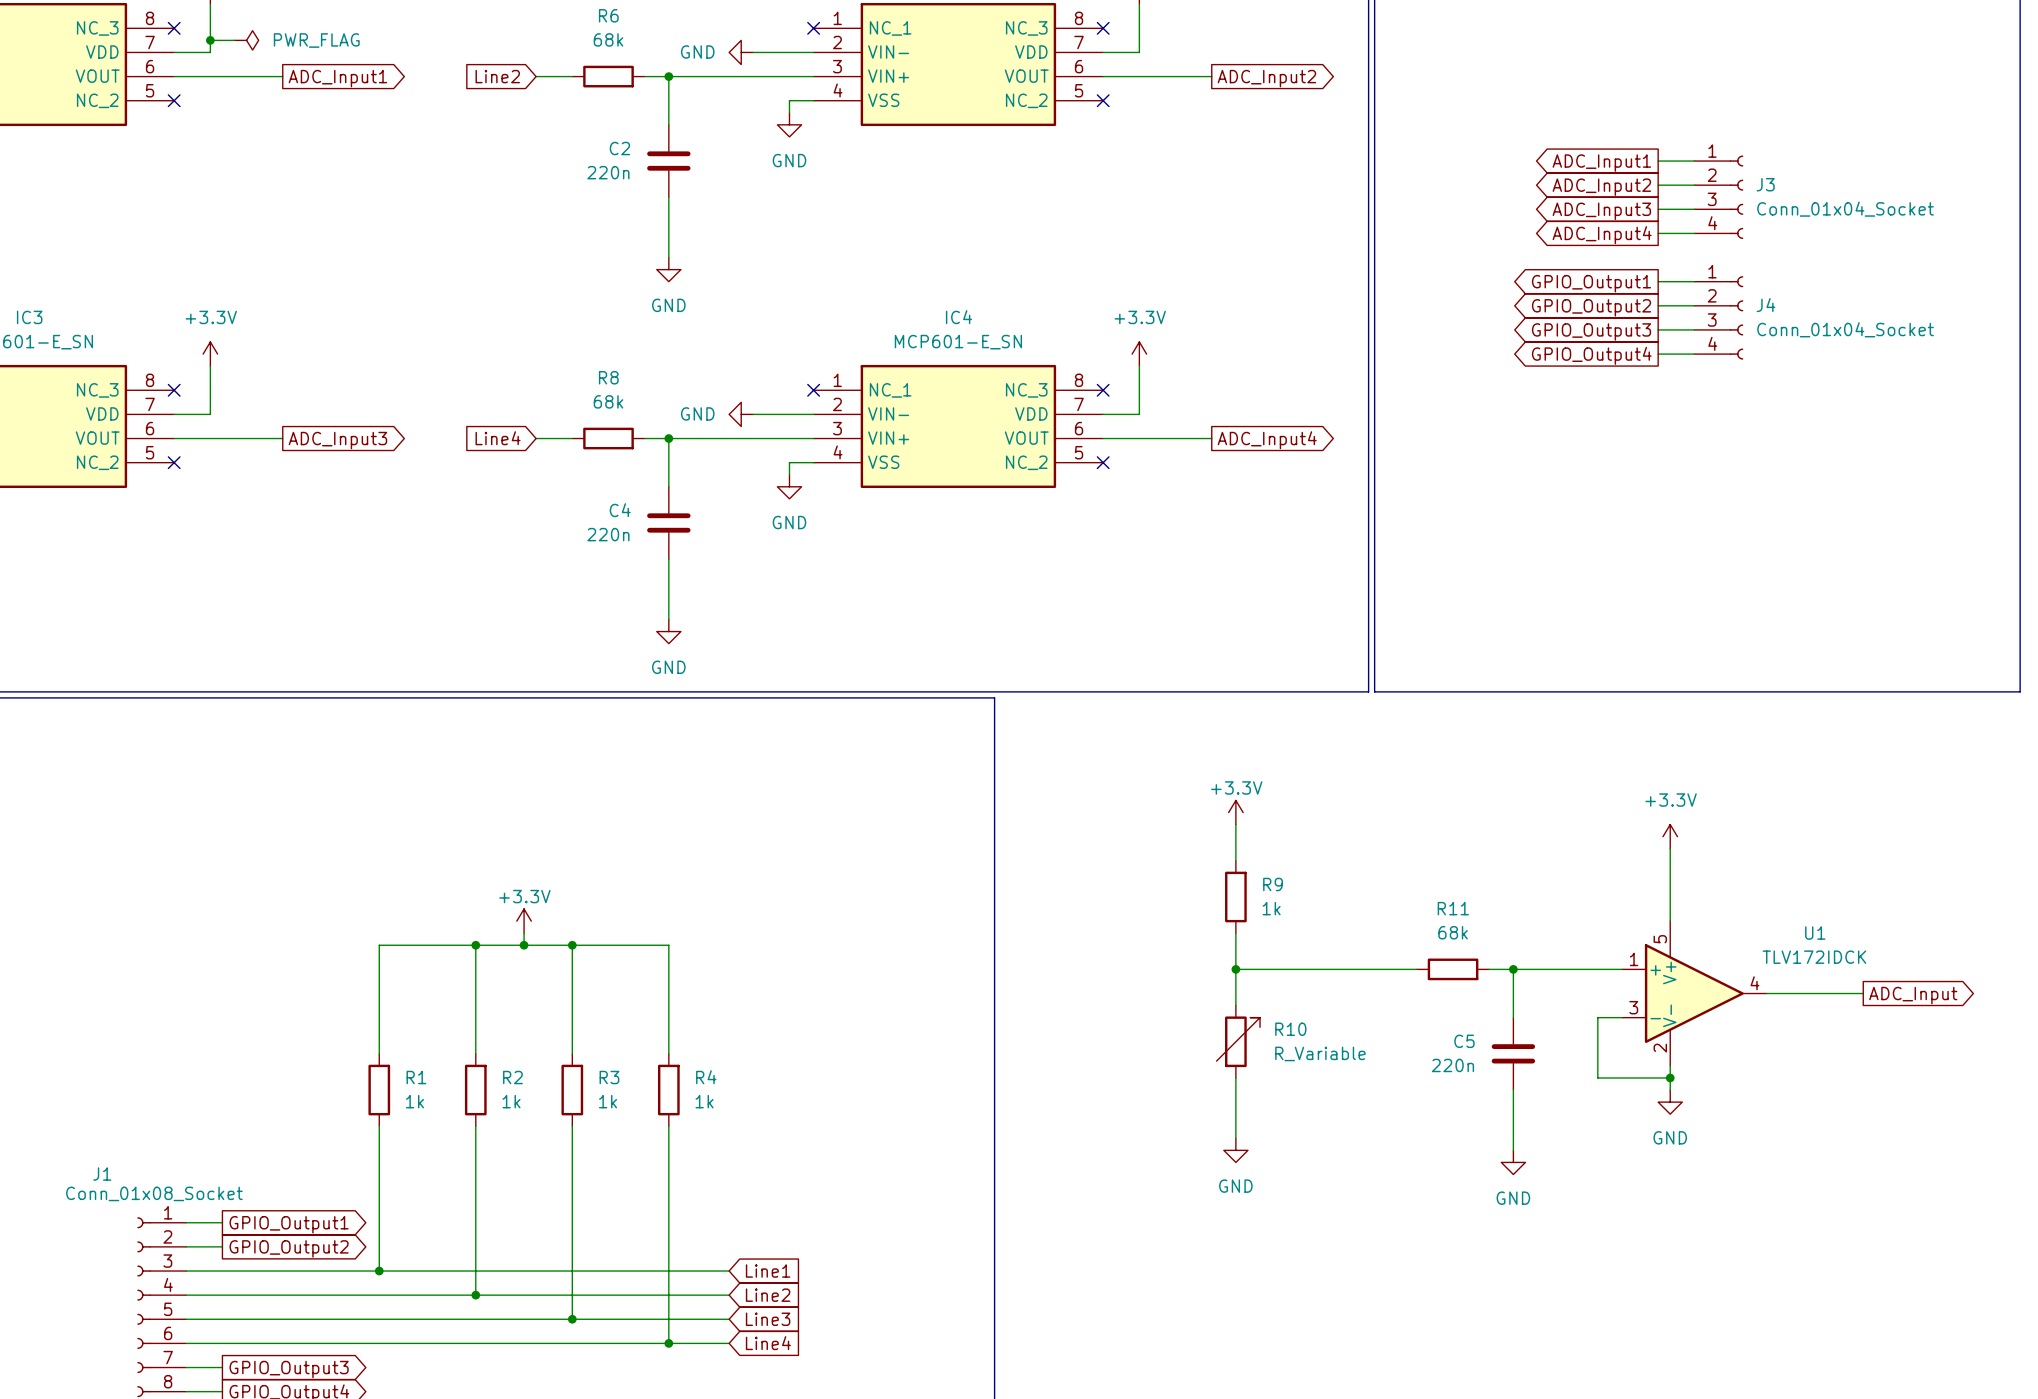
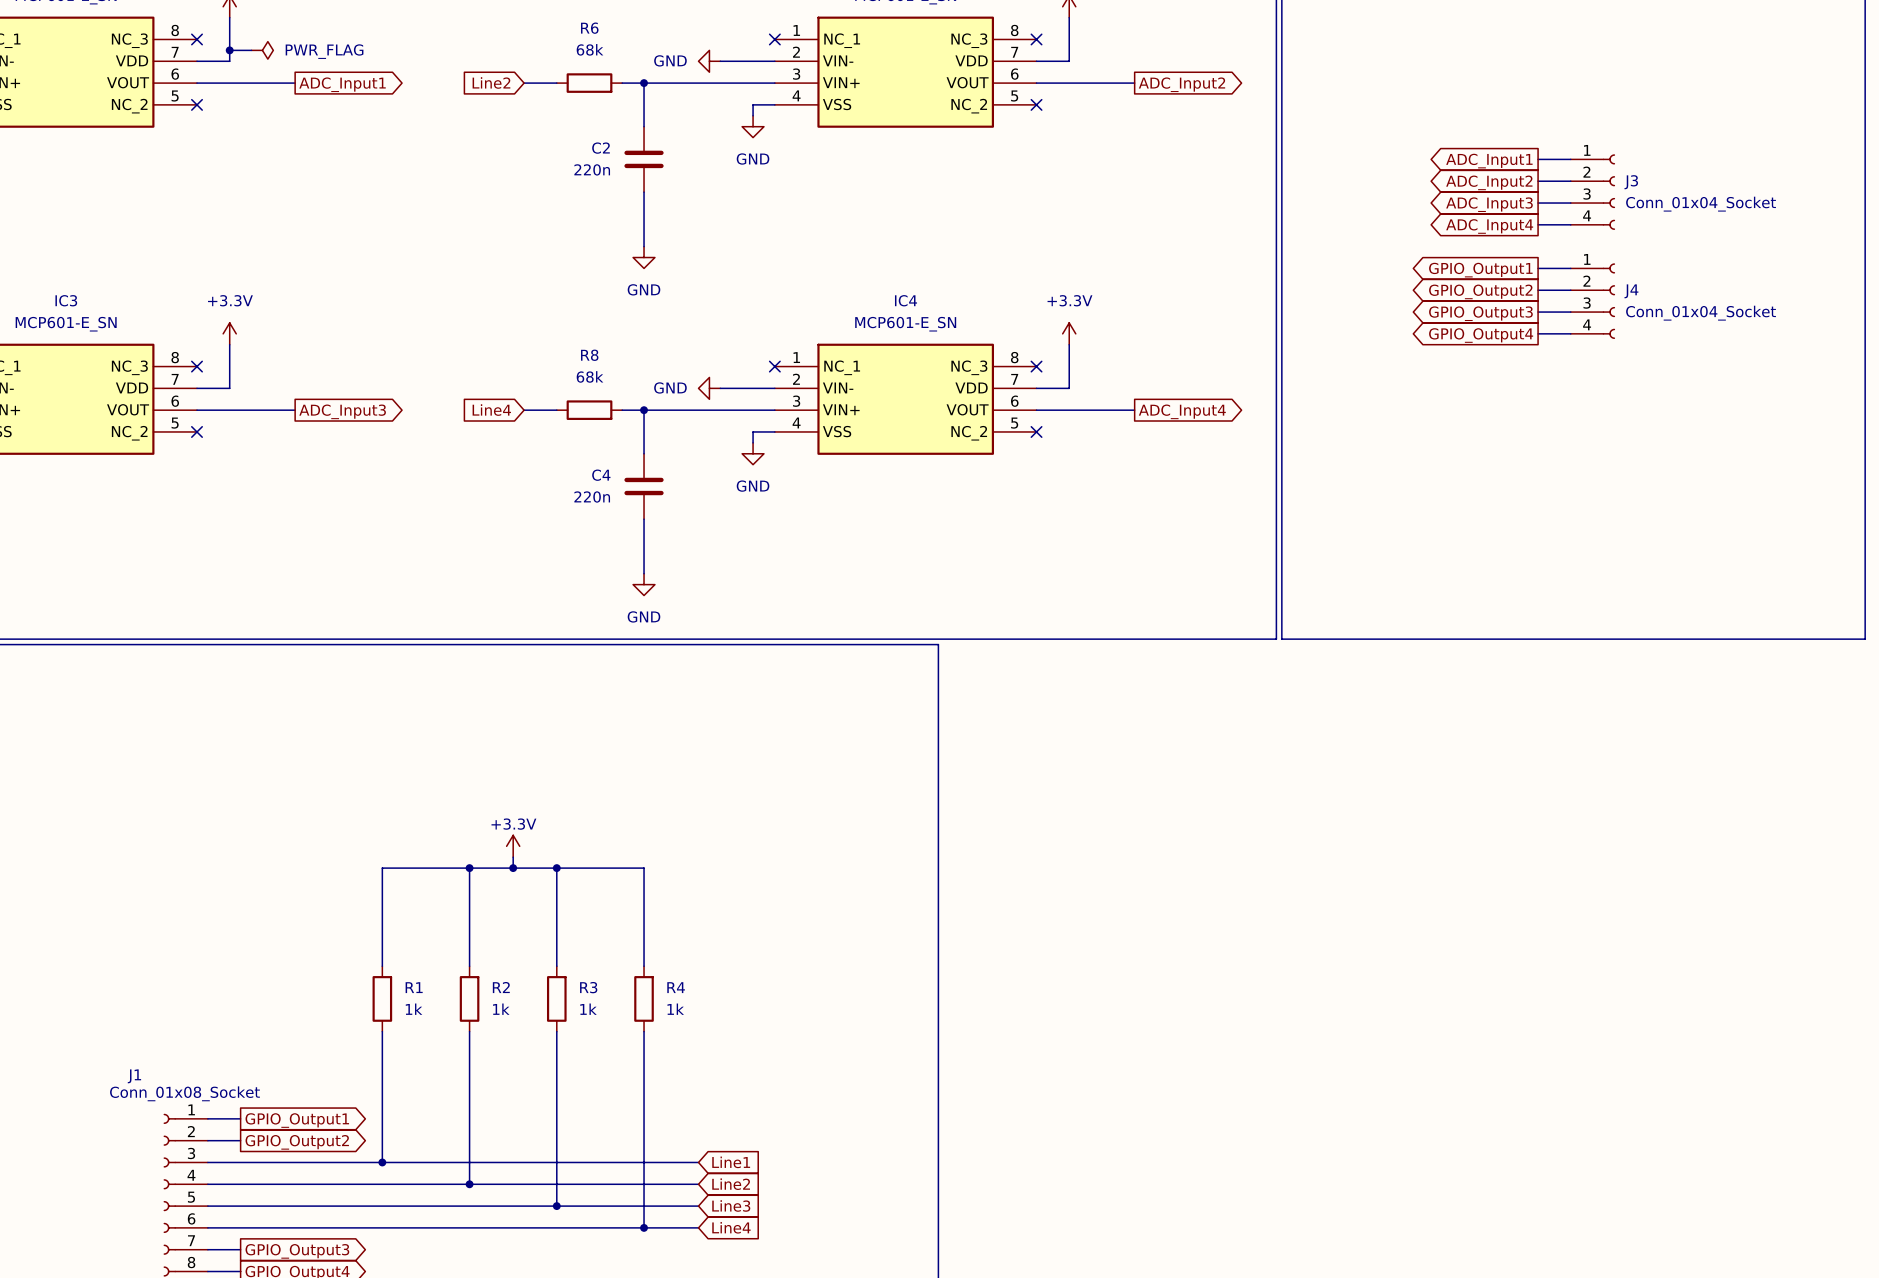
power symbol: +3.3V (1235, 812) -> none
wire: (1235, 824) (1235, 860) -> none
power symbol: +3.3V (1670, 836) -> none
wire: (1670, 848) (1670, 921) -> none
R9: 1k (1235, 897) -> none
wire: (1235, 933) (1235, 1005) -> none
wire: (1235, 969) (1416, 969) -> none
junction: (1235, 969) -> none
R11: 68k (1453, 969) -> none
wire: (1489, 969) (1621, 969) -> none
wire: (1513, 969) (1513, 1017) -> none
junction: (1513, 969) -> none
U1: TLV172IDCK (1694, 993) -> none
wire: (1766, 993) (1863, 993) -> none
global label: ADC_Input (1913, 995) -> none
wire: (1621, 1017) (1597, 1017) (1597, 1077) (1670, 1077) -> none
R10: R_Variable (1238, 1041) -> none
C5: 220n (1513, 1053) -> none
wire: (1670, 1065) (1670, 1090) -> none
wire: (1235, 1077) (1235, 1138) -> none
junction: (1670, 1077) -> none
wire: (1513, 1090) (1513, 1150) -> none
power symbol: GND (1670, 1102) -> none
power symbol: GND (1235, 1150) -> none
power symbol: GND (1513, 1162) -> none

